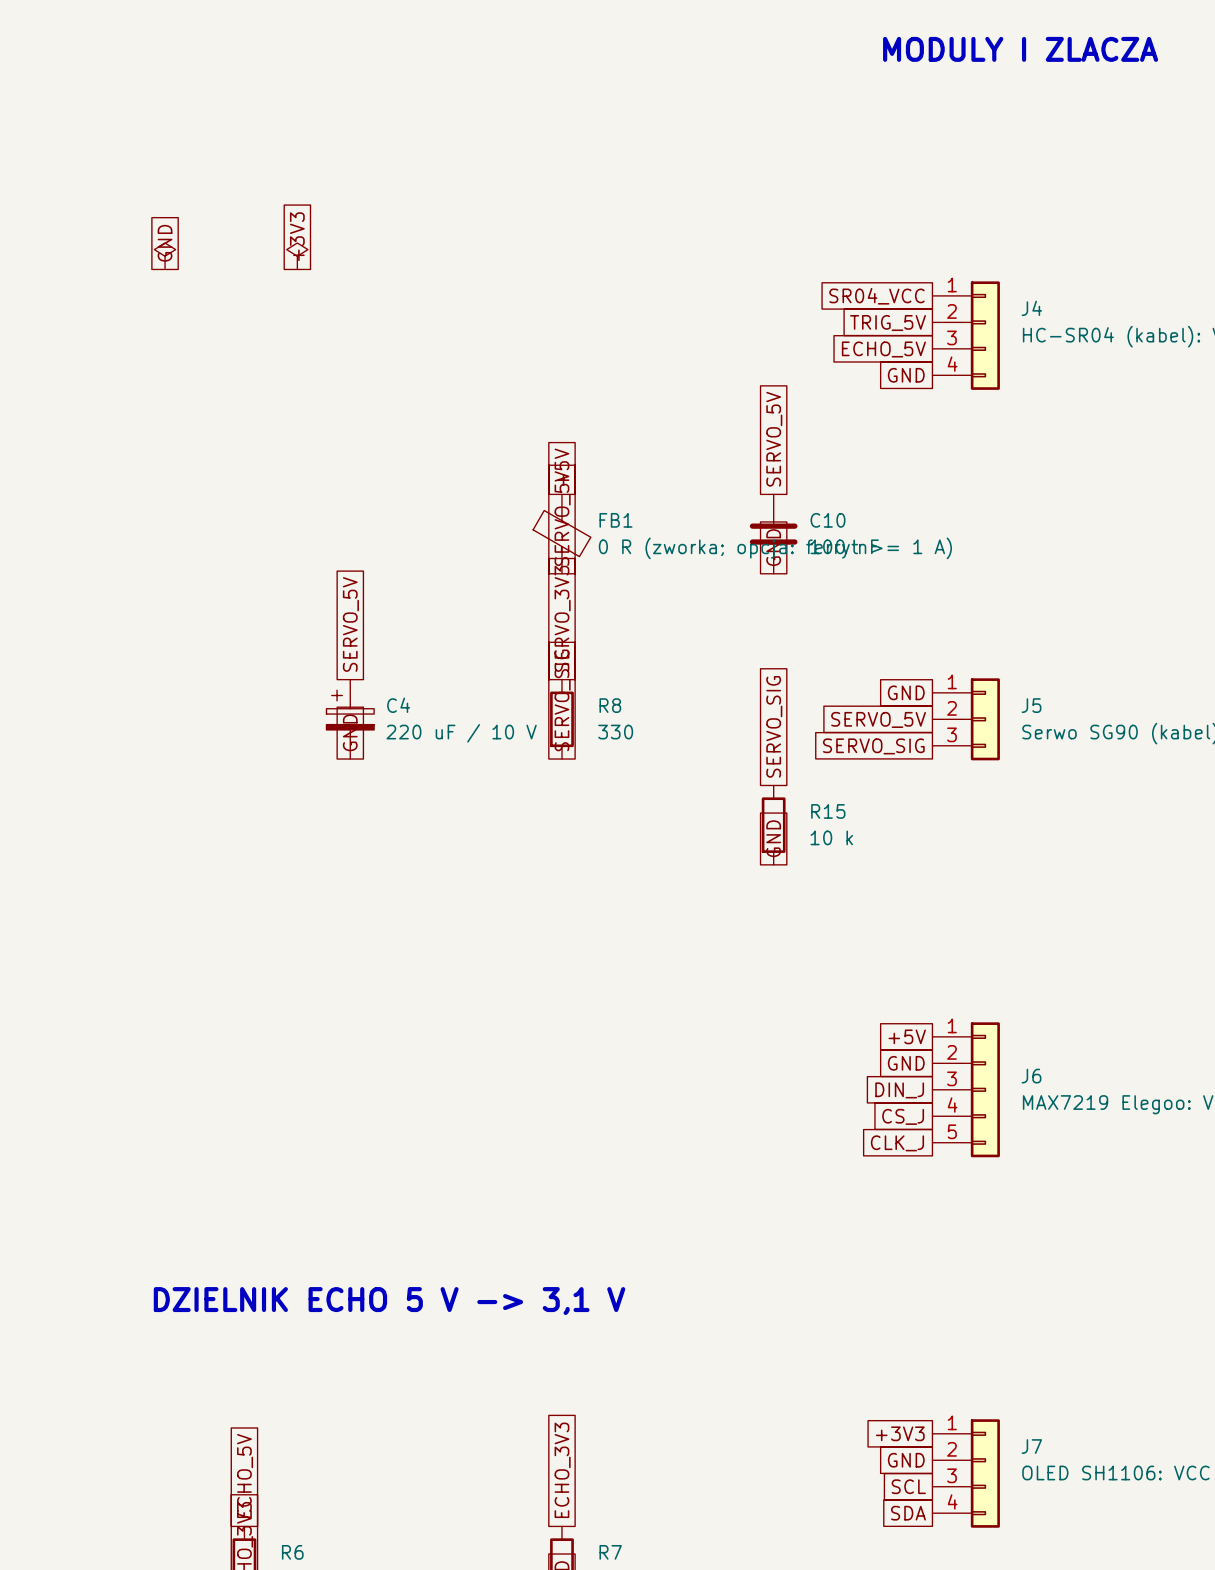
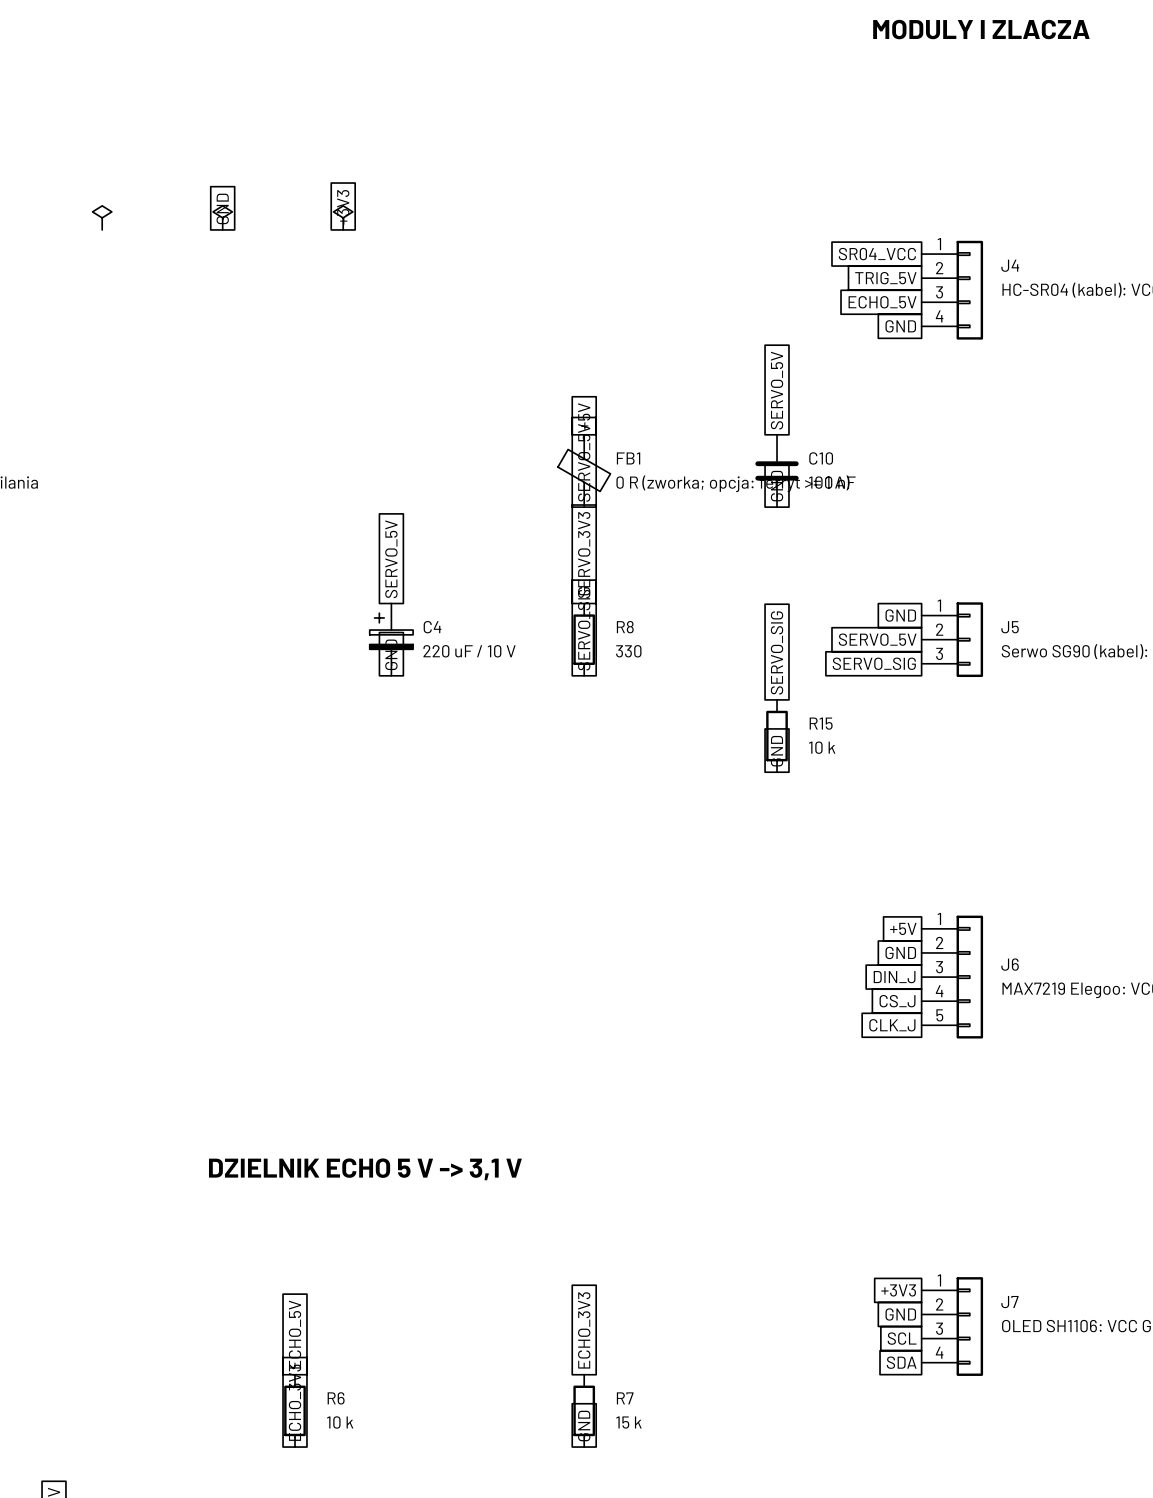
power symbol: none -> (102, 217)

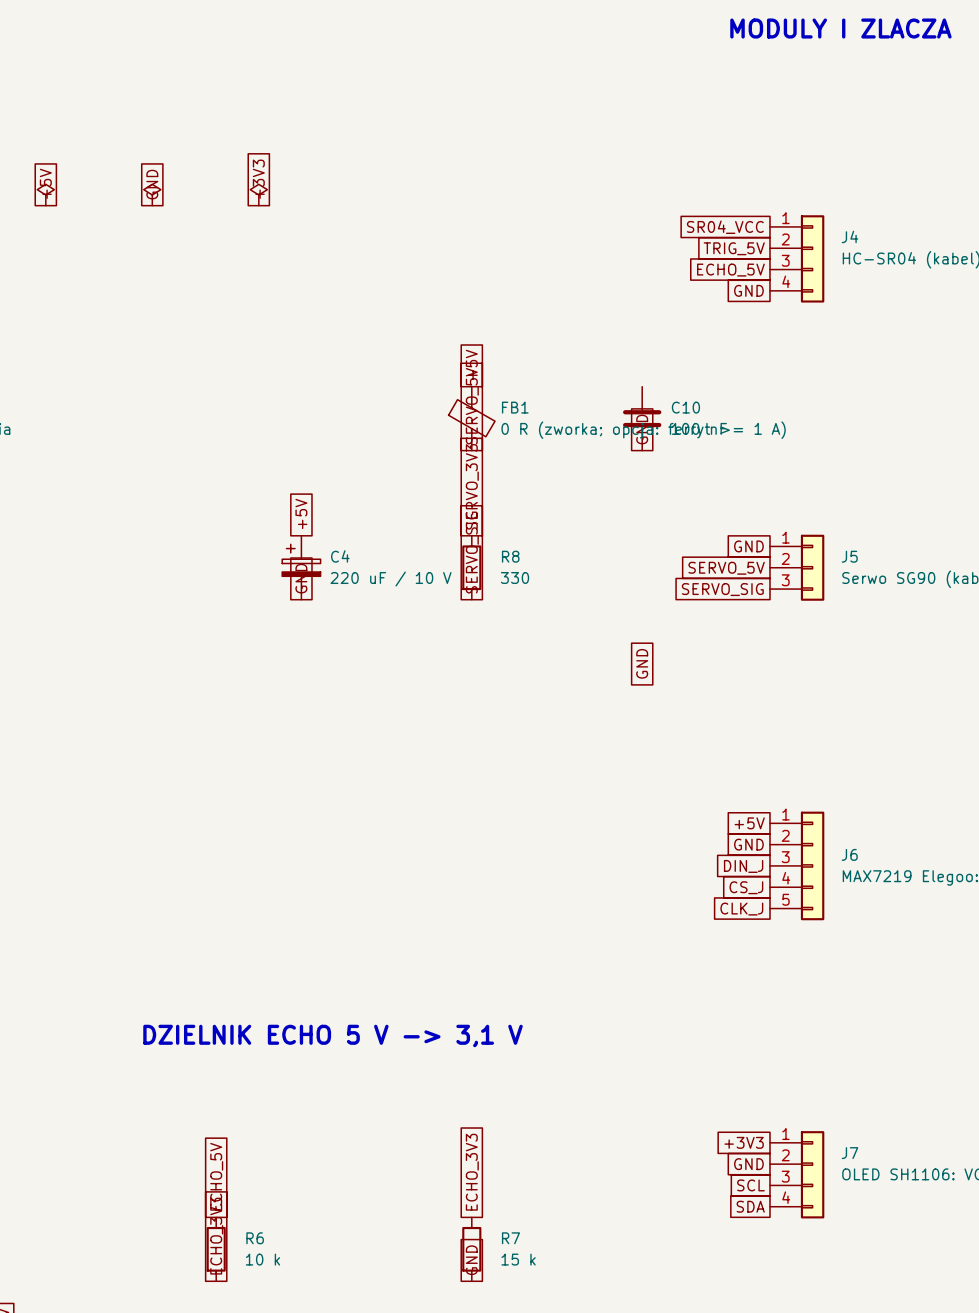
global label: none -> +5V (45, 183)
global label: SERVO_5V (777, 390) -> none
global label: SERVO_5V (391, 559) -> +5V (301, 513)
global label: SERVO_SIG (777, 652) -> none
R15: 10 k (777, 736) -> none

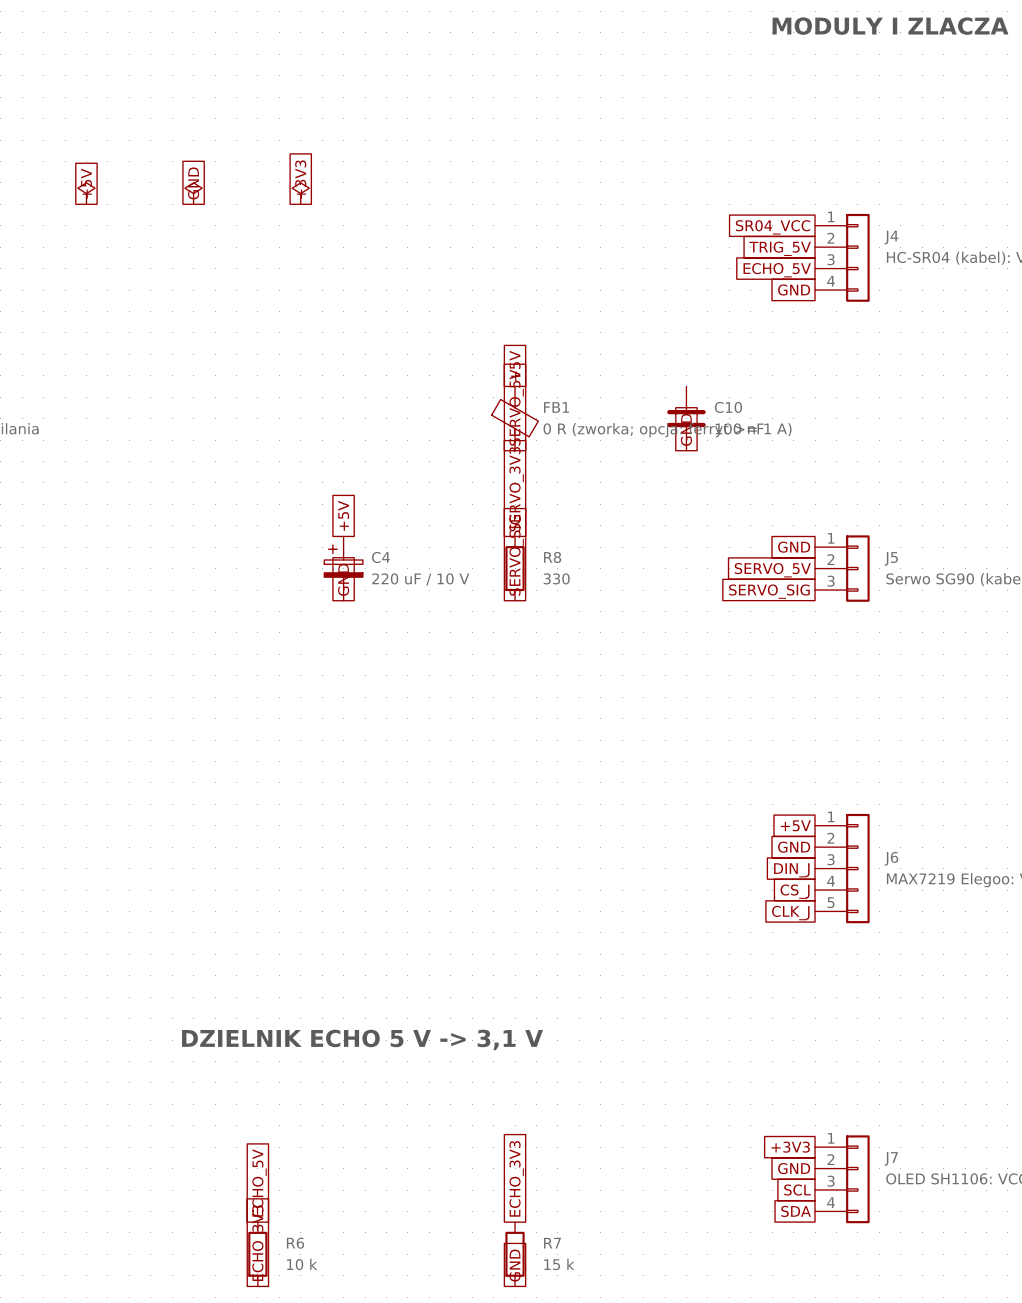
global label: GND (642, 663) -> none

